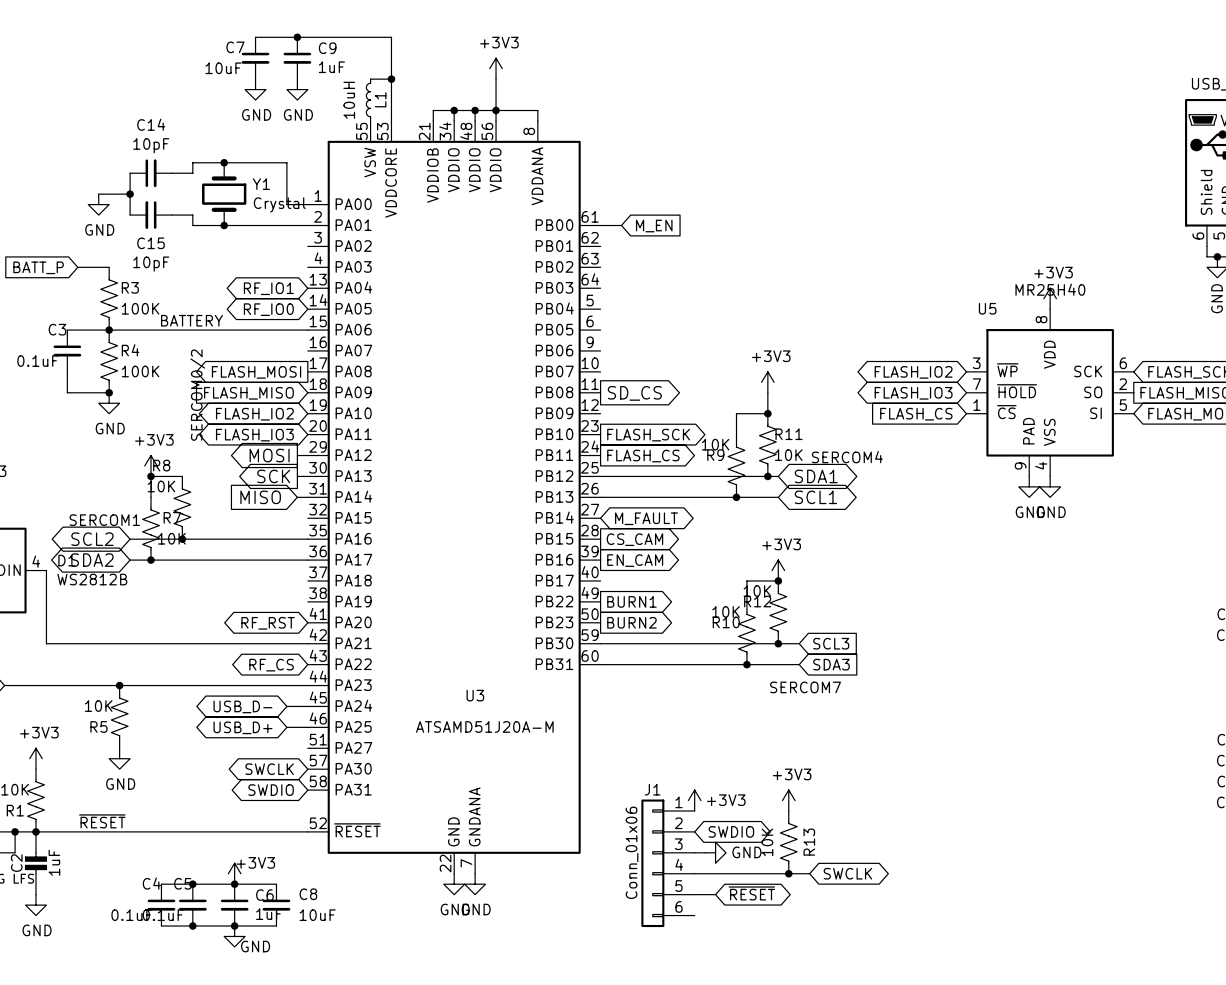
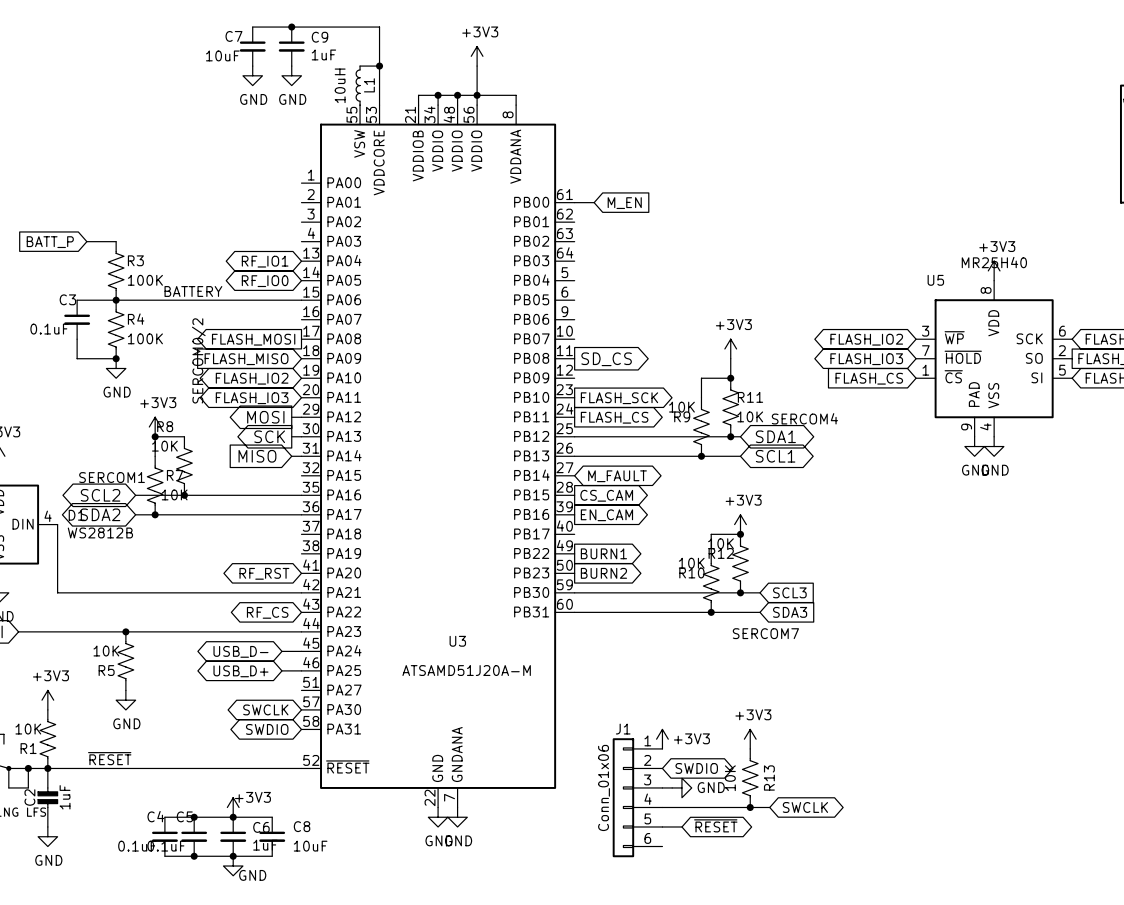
junction: (224, 162) -> none
wire: (130, 173) (130, 215) -> none
C14: 10pF (151, 173) -> none
wire: (171, 173) (192, 173) (192, 162) (286, 162) (286, 204) (307, 204) -> none
wire: (98, 194) (130, 194) -> none
junction: (130, 194) -> none
Y1: Crystal (224, 194) -> none
power symbol: GND (98, 204) -> none
C15: 10pF (151, 215) -> none
wire: (171, 215) (192, 215) (192, 225) (307, 225) -> none
junction: (224, 225) -> none

